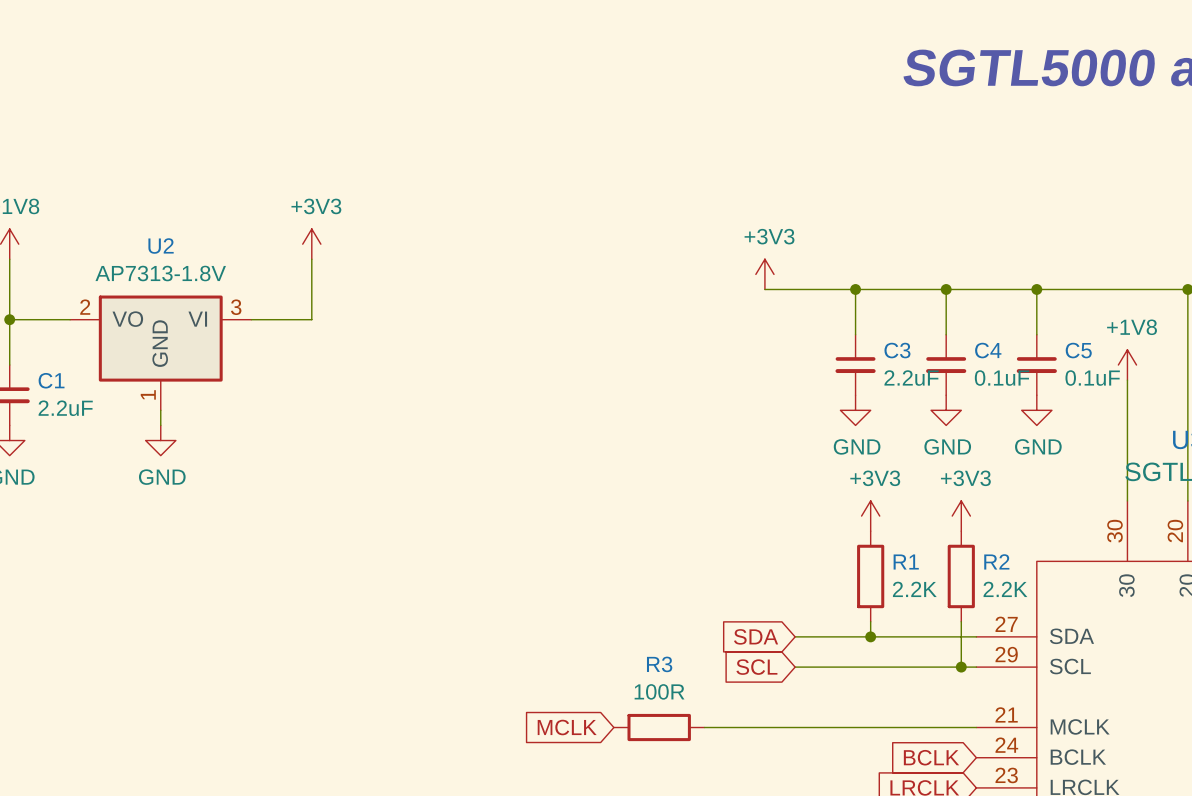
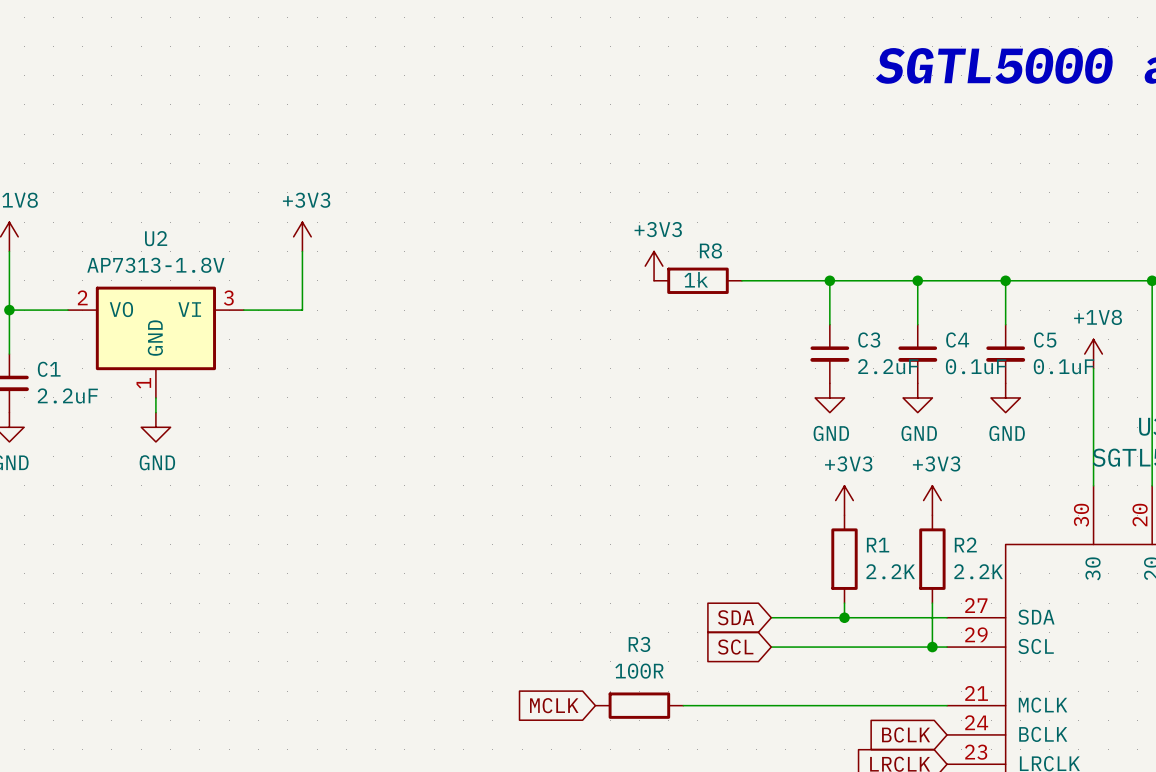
power symbol position: +3V3 (764, 274) -> +3V3 (654, 266)
R8: none -> 1k (697, 280)

